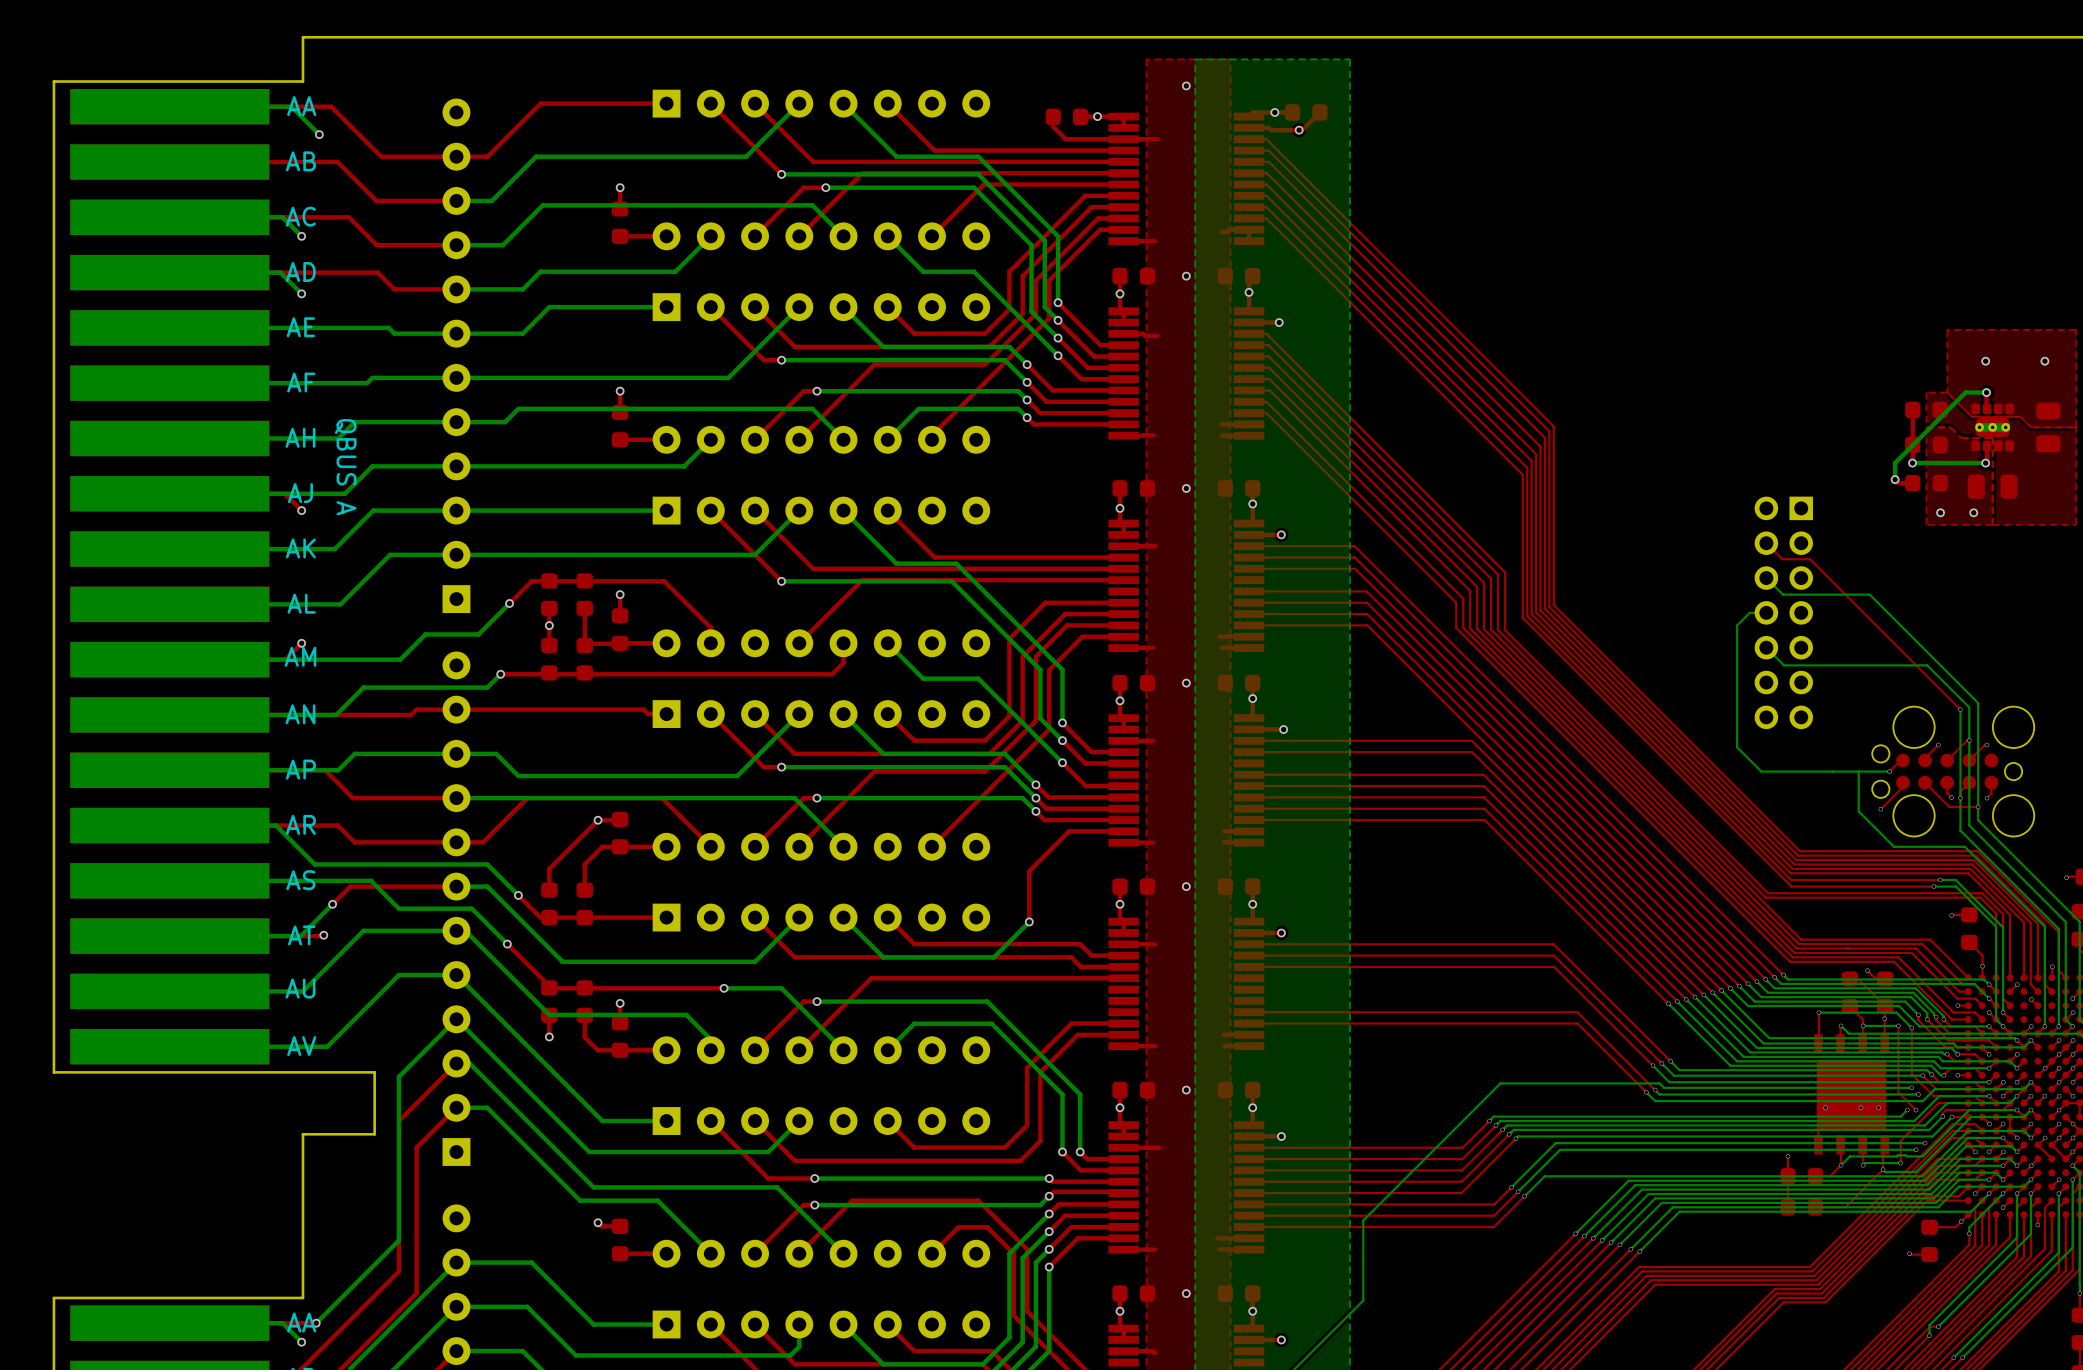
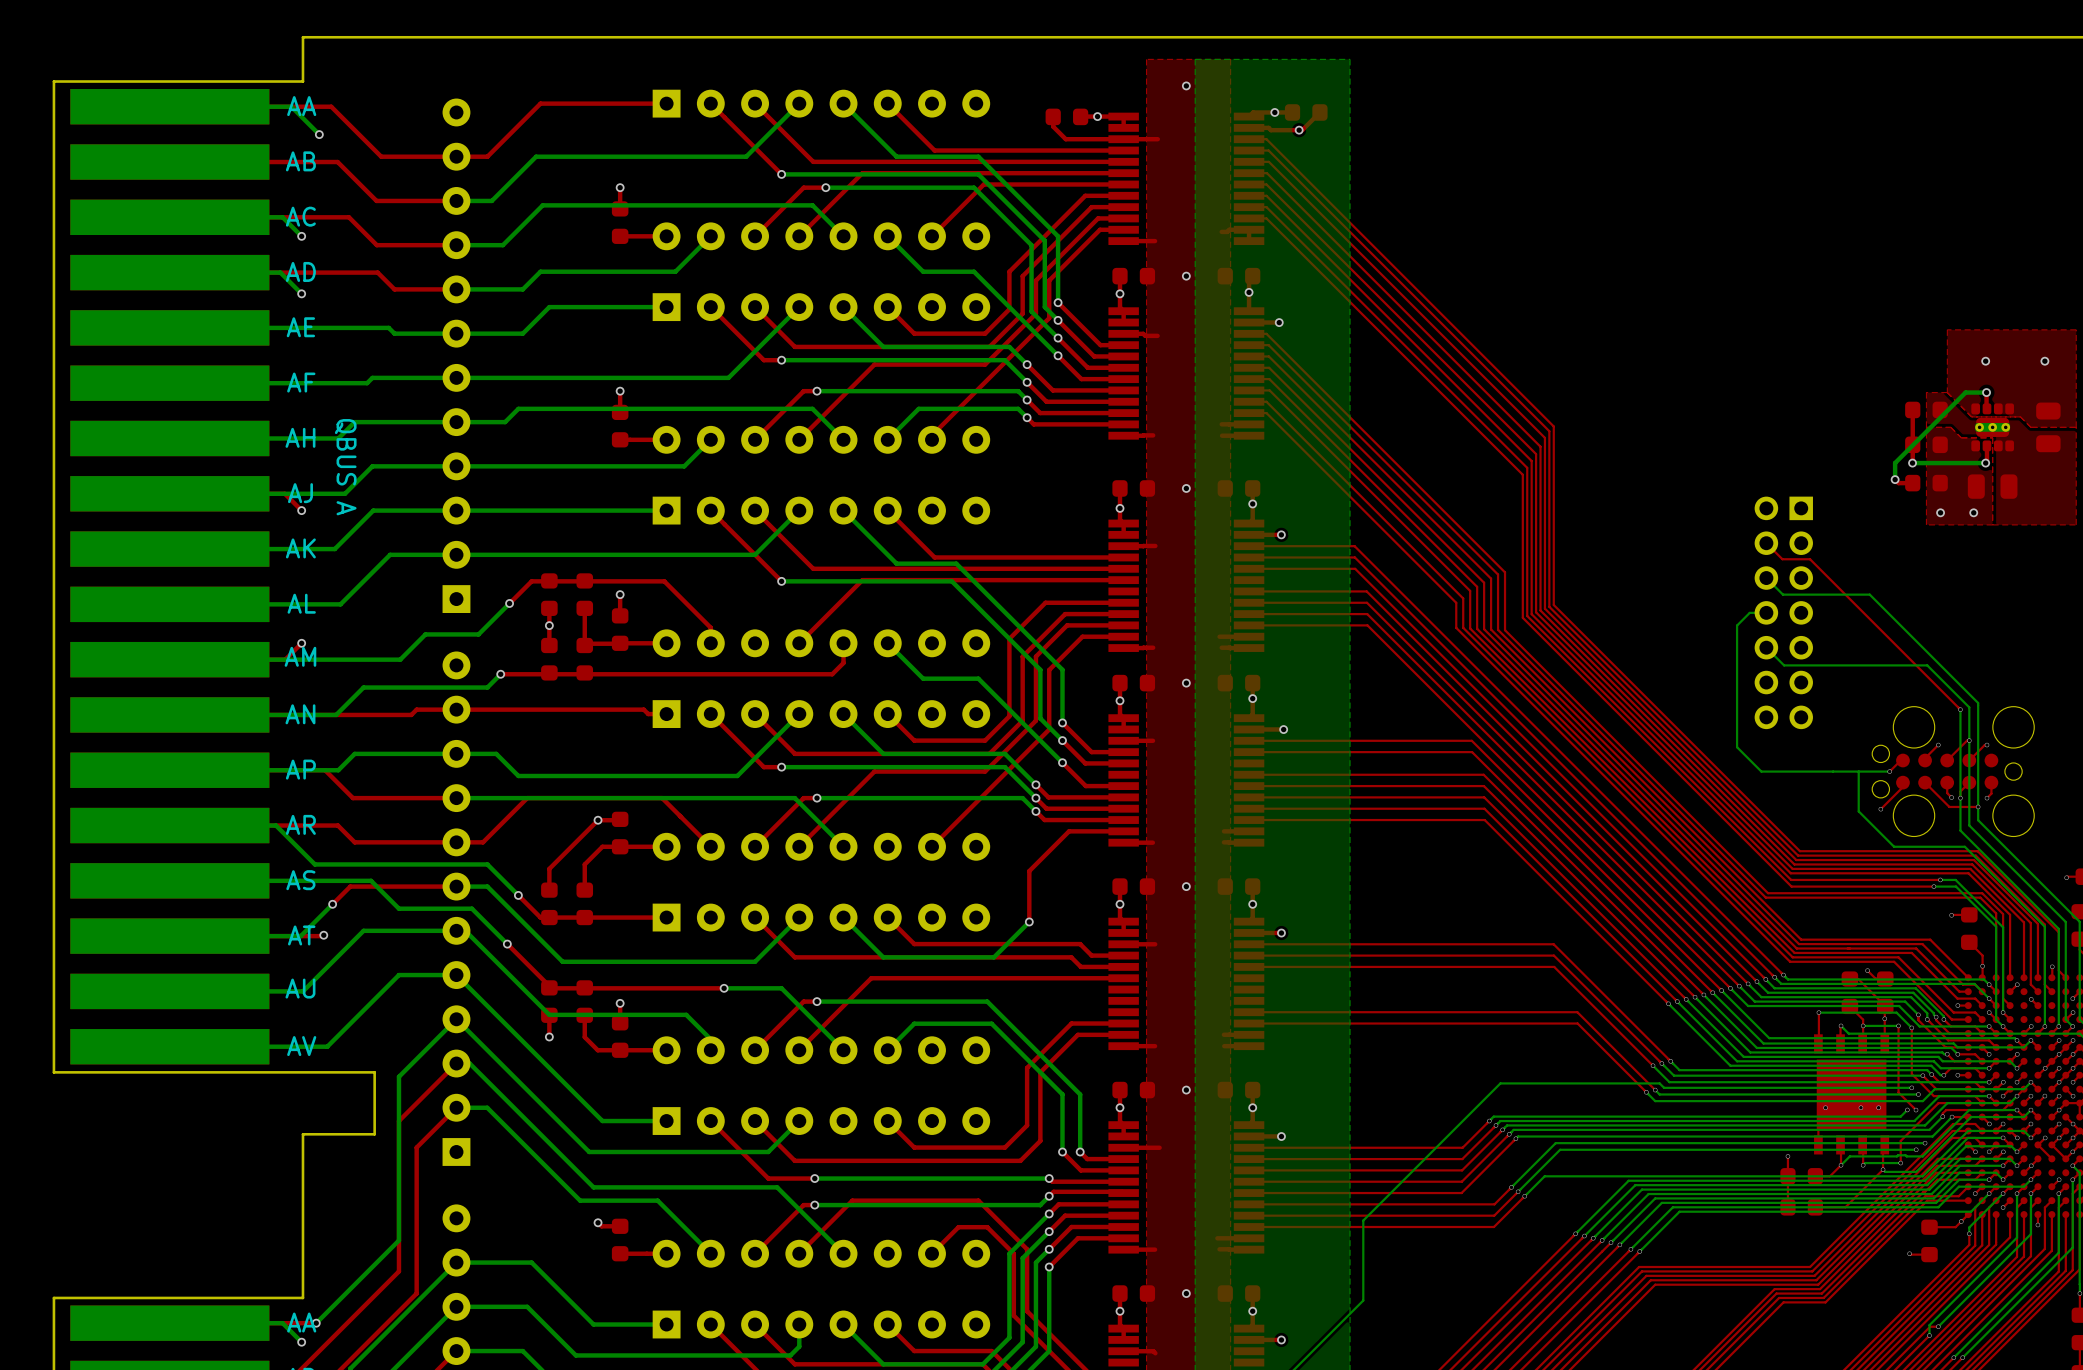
top track: (2010, 1117) (2010, 1130) -> none

